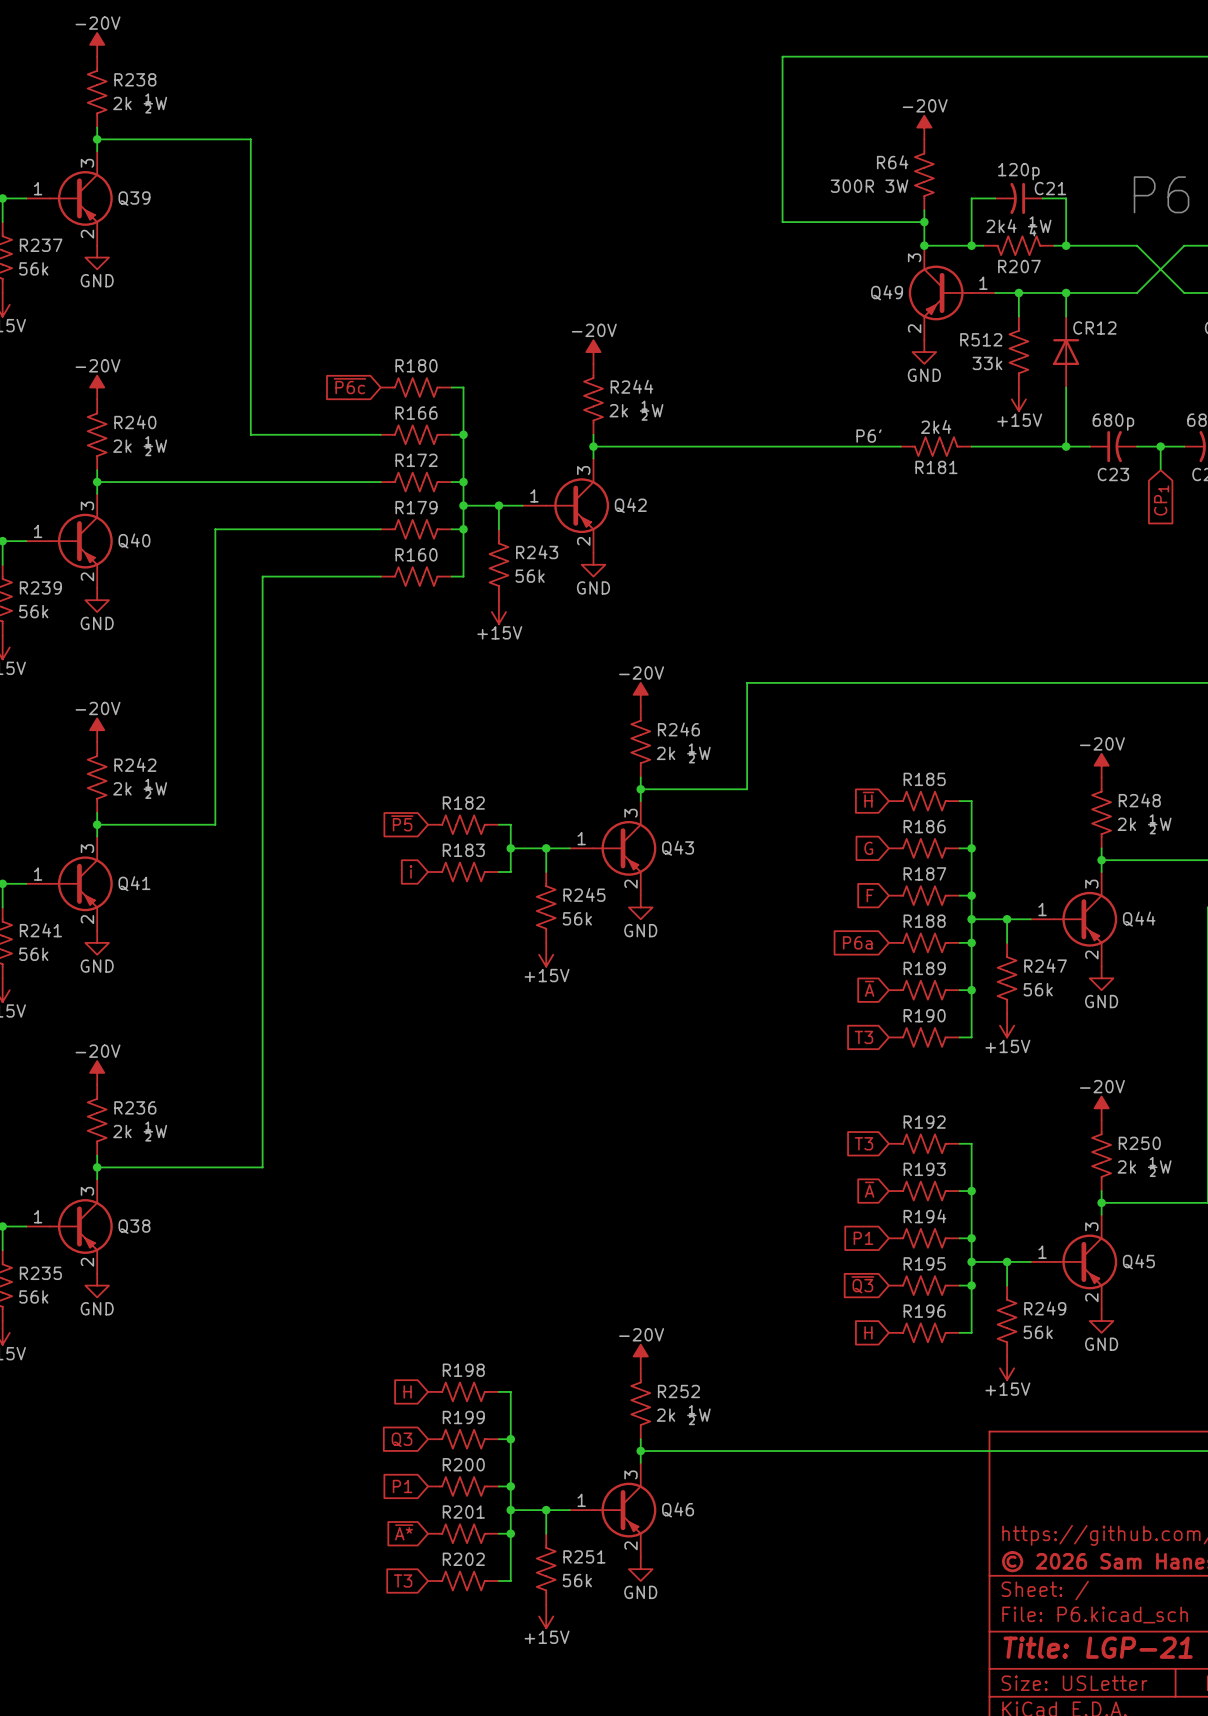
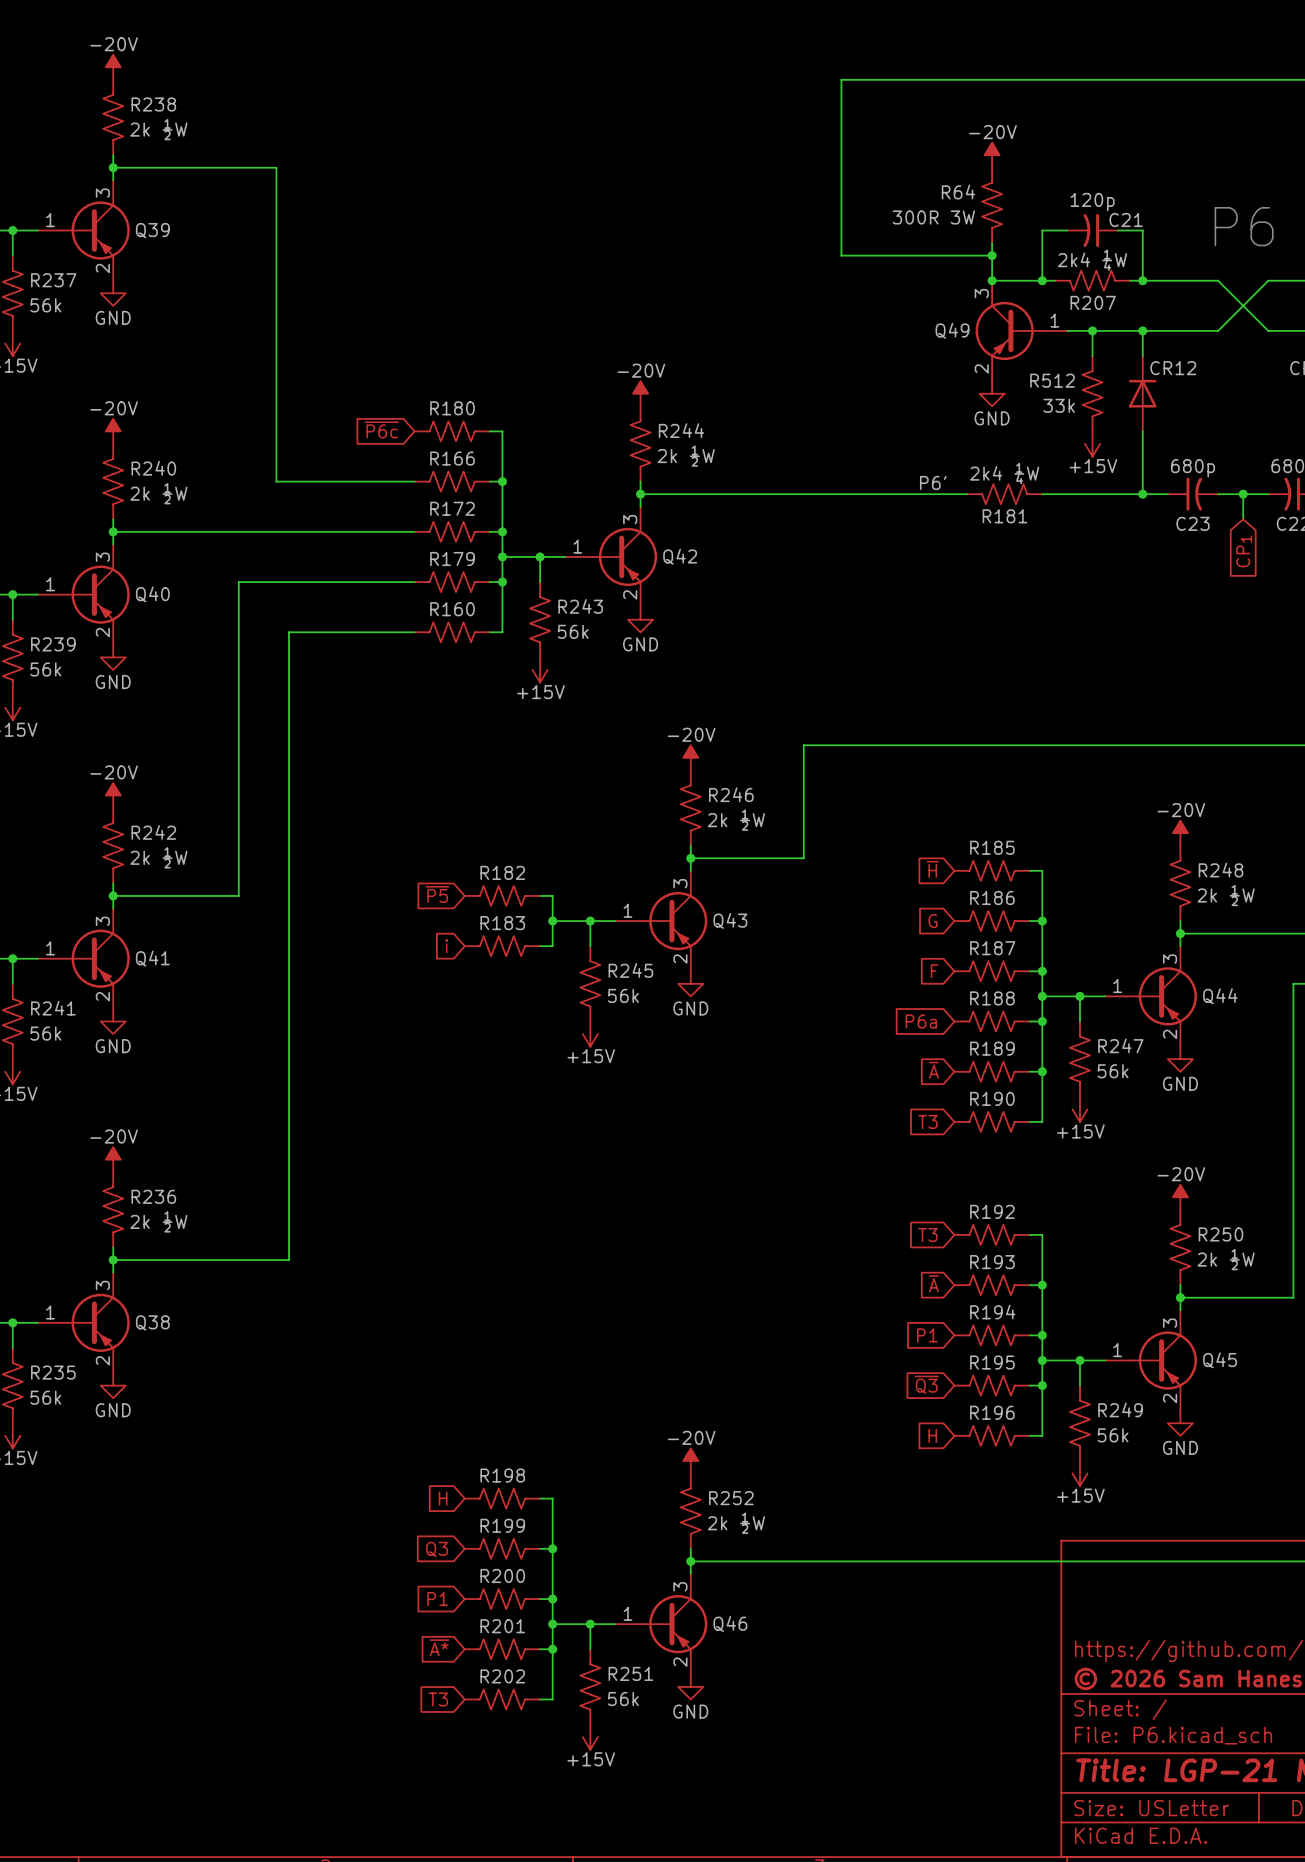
R181 value: 2k4 (936, 426) -> 2k4 ¼W (1004, 473)

